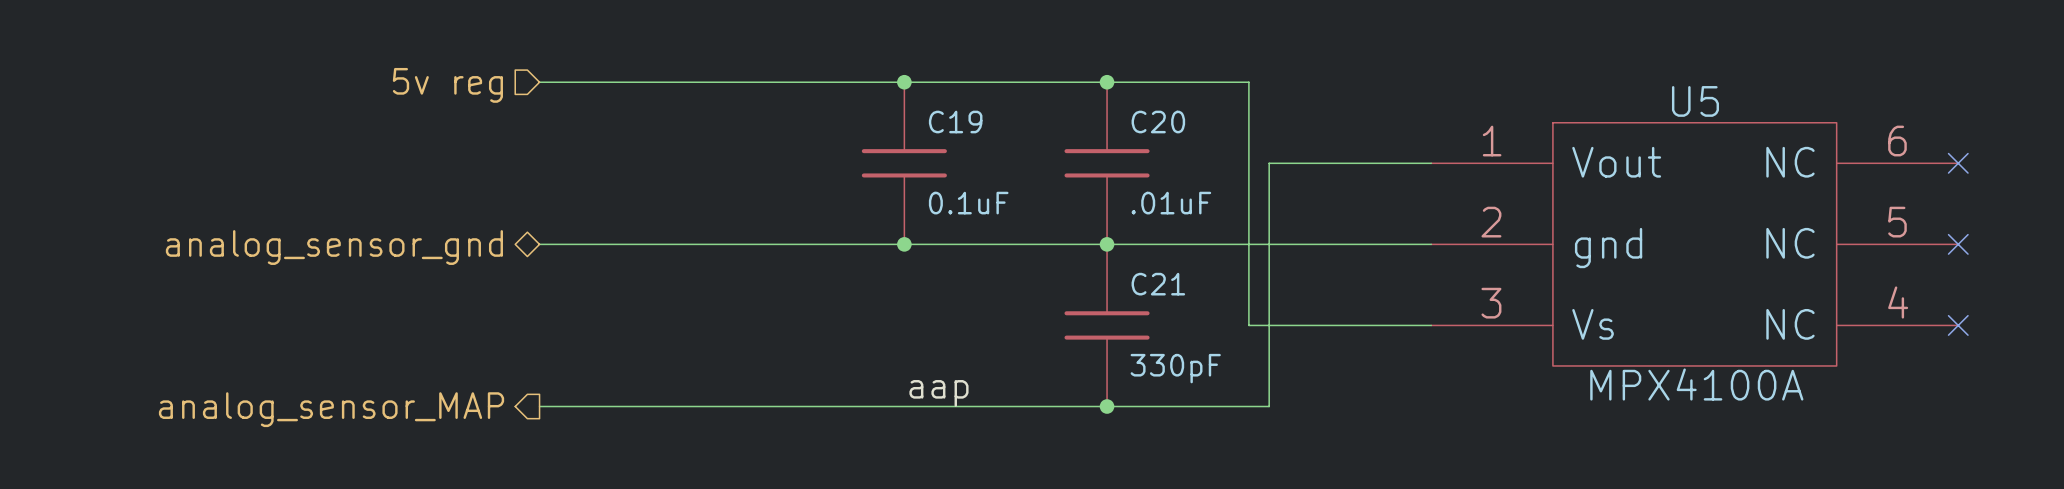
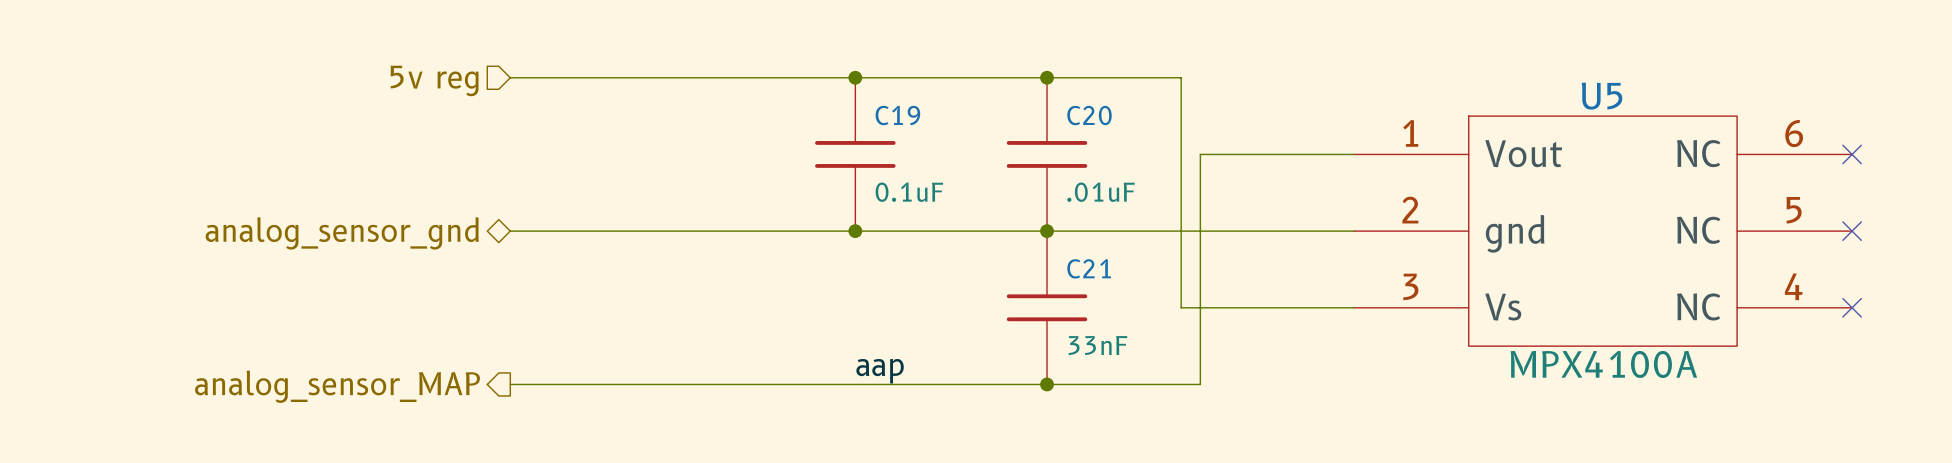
C21 value: 330pF (1175, 368) -> 33nF (1098, 345)

